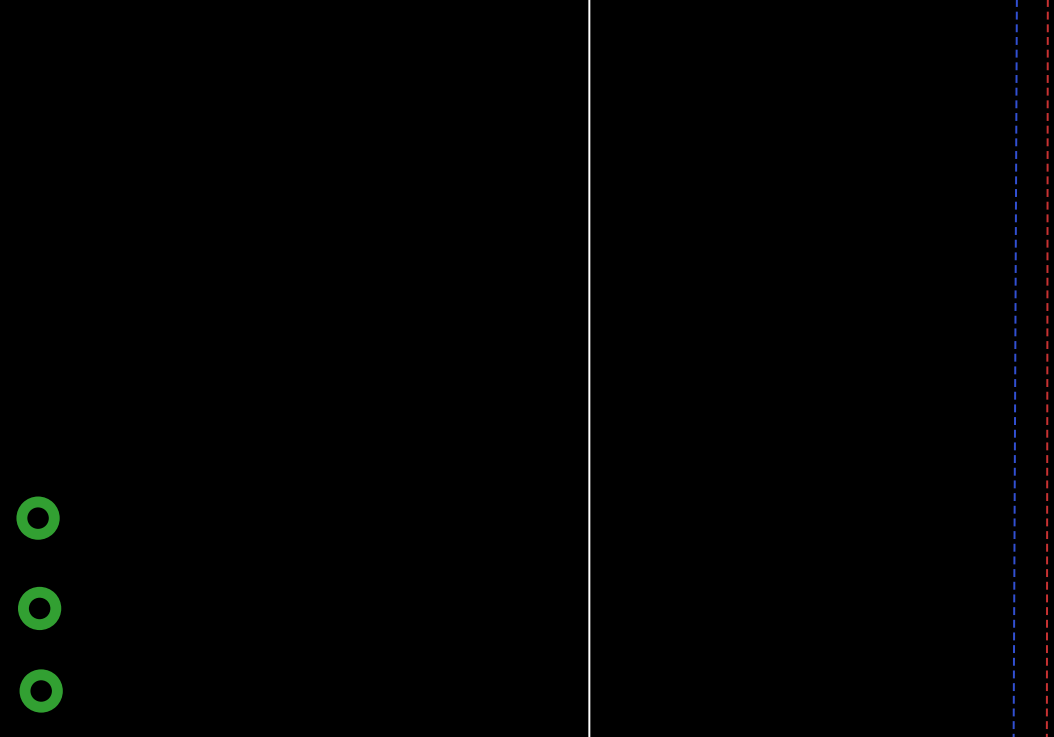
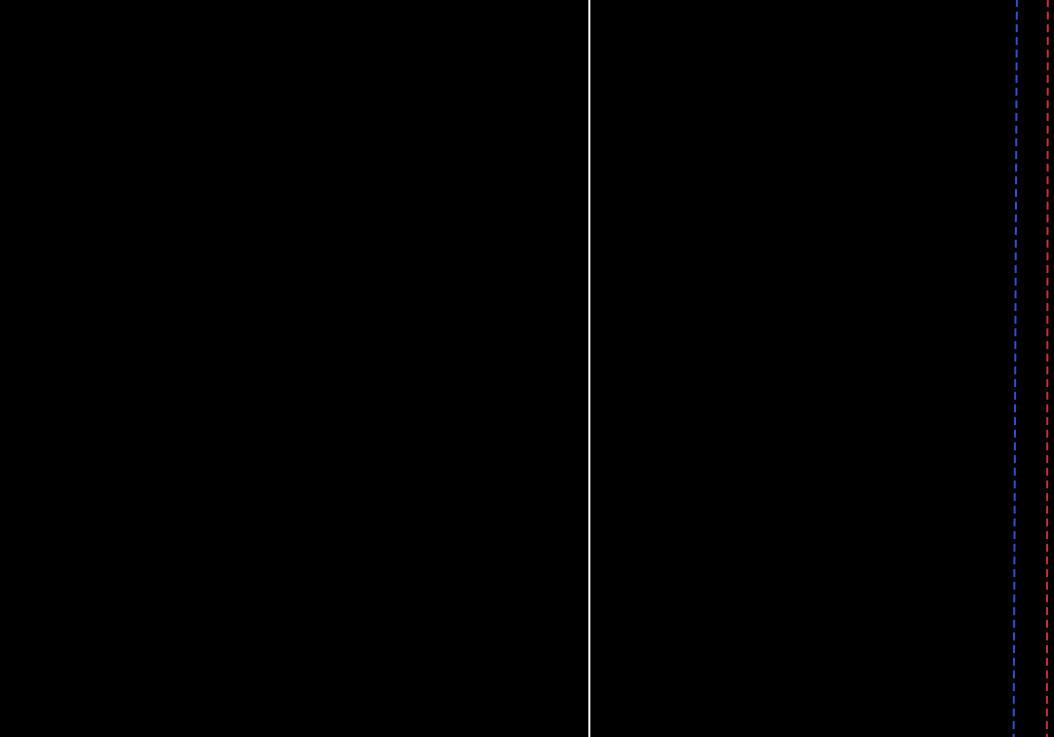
via: (38, 518) -> none
via: (39, 608) -> none
via: (41, 690) -> none

